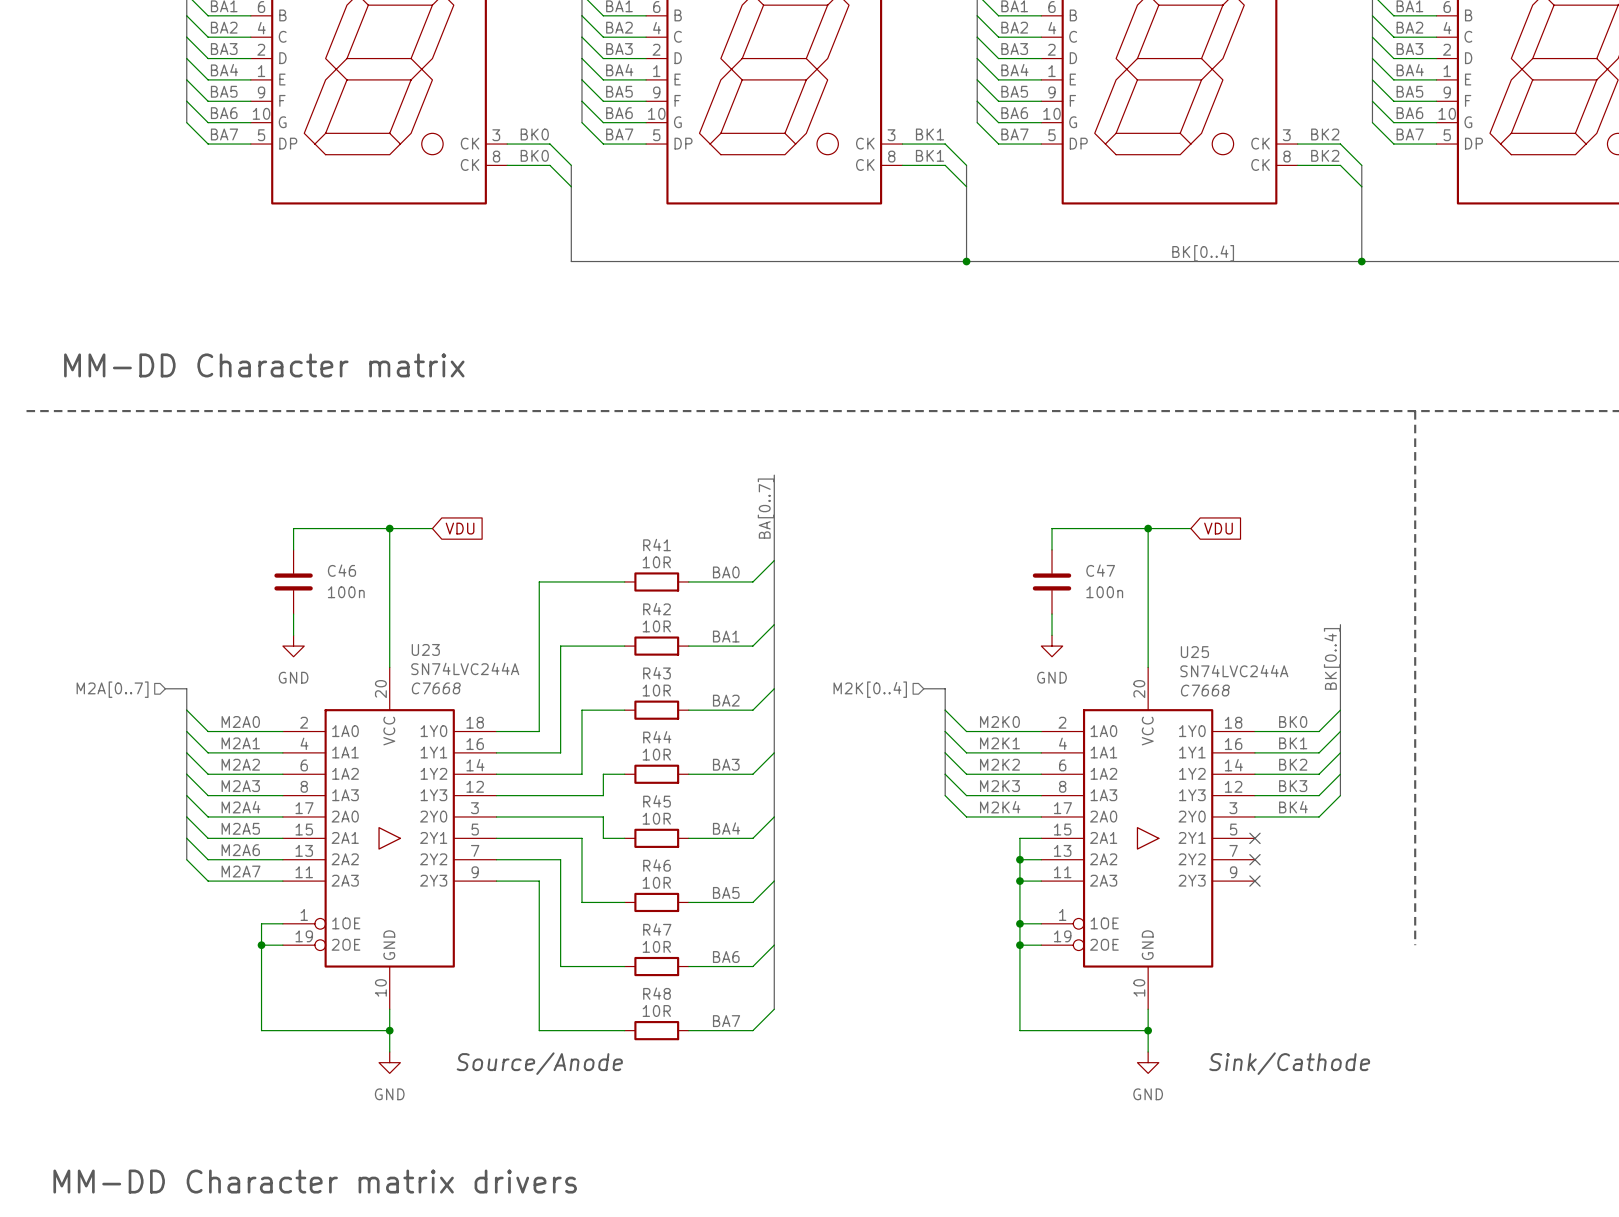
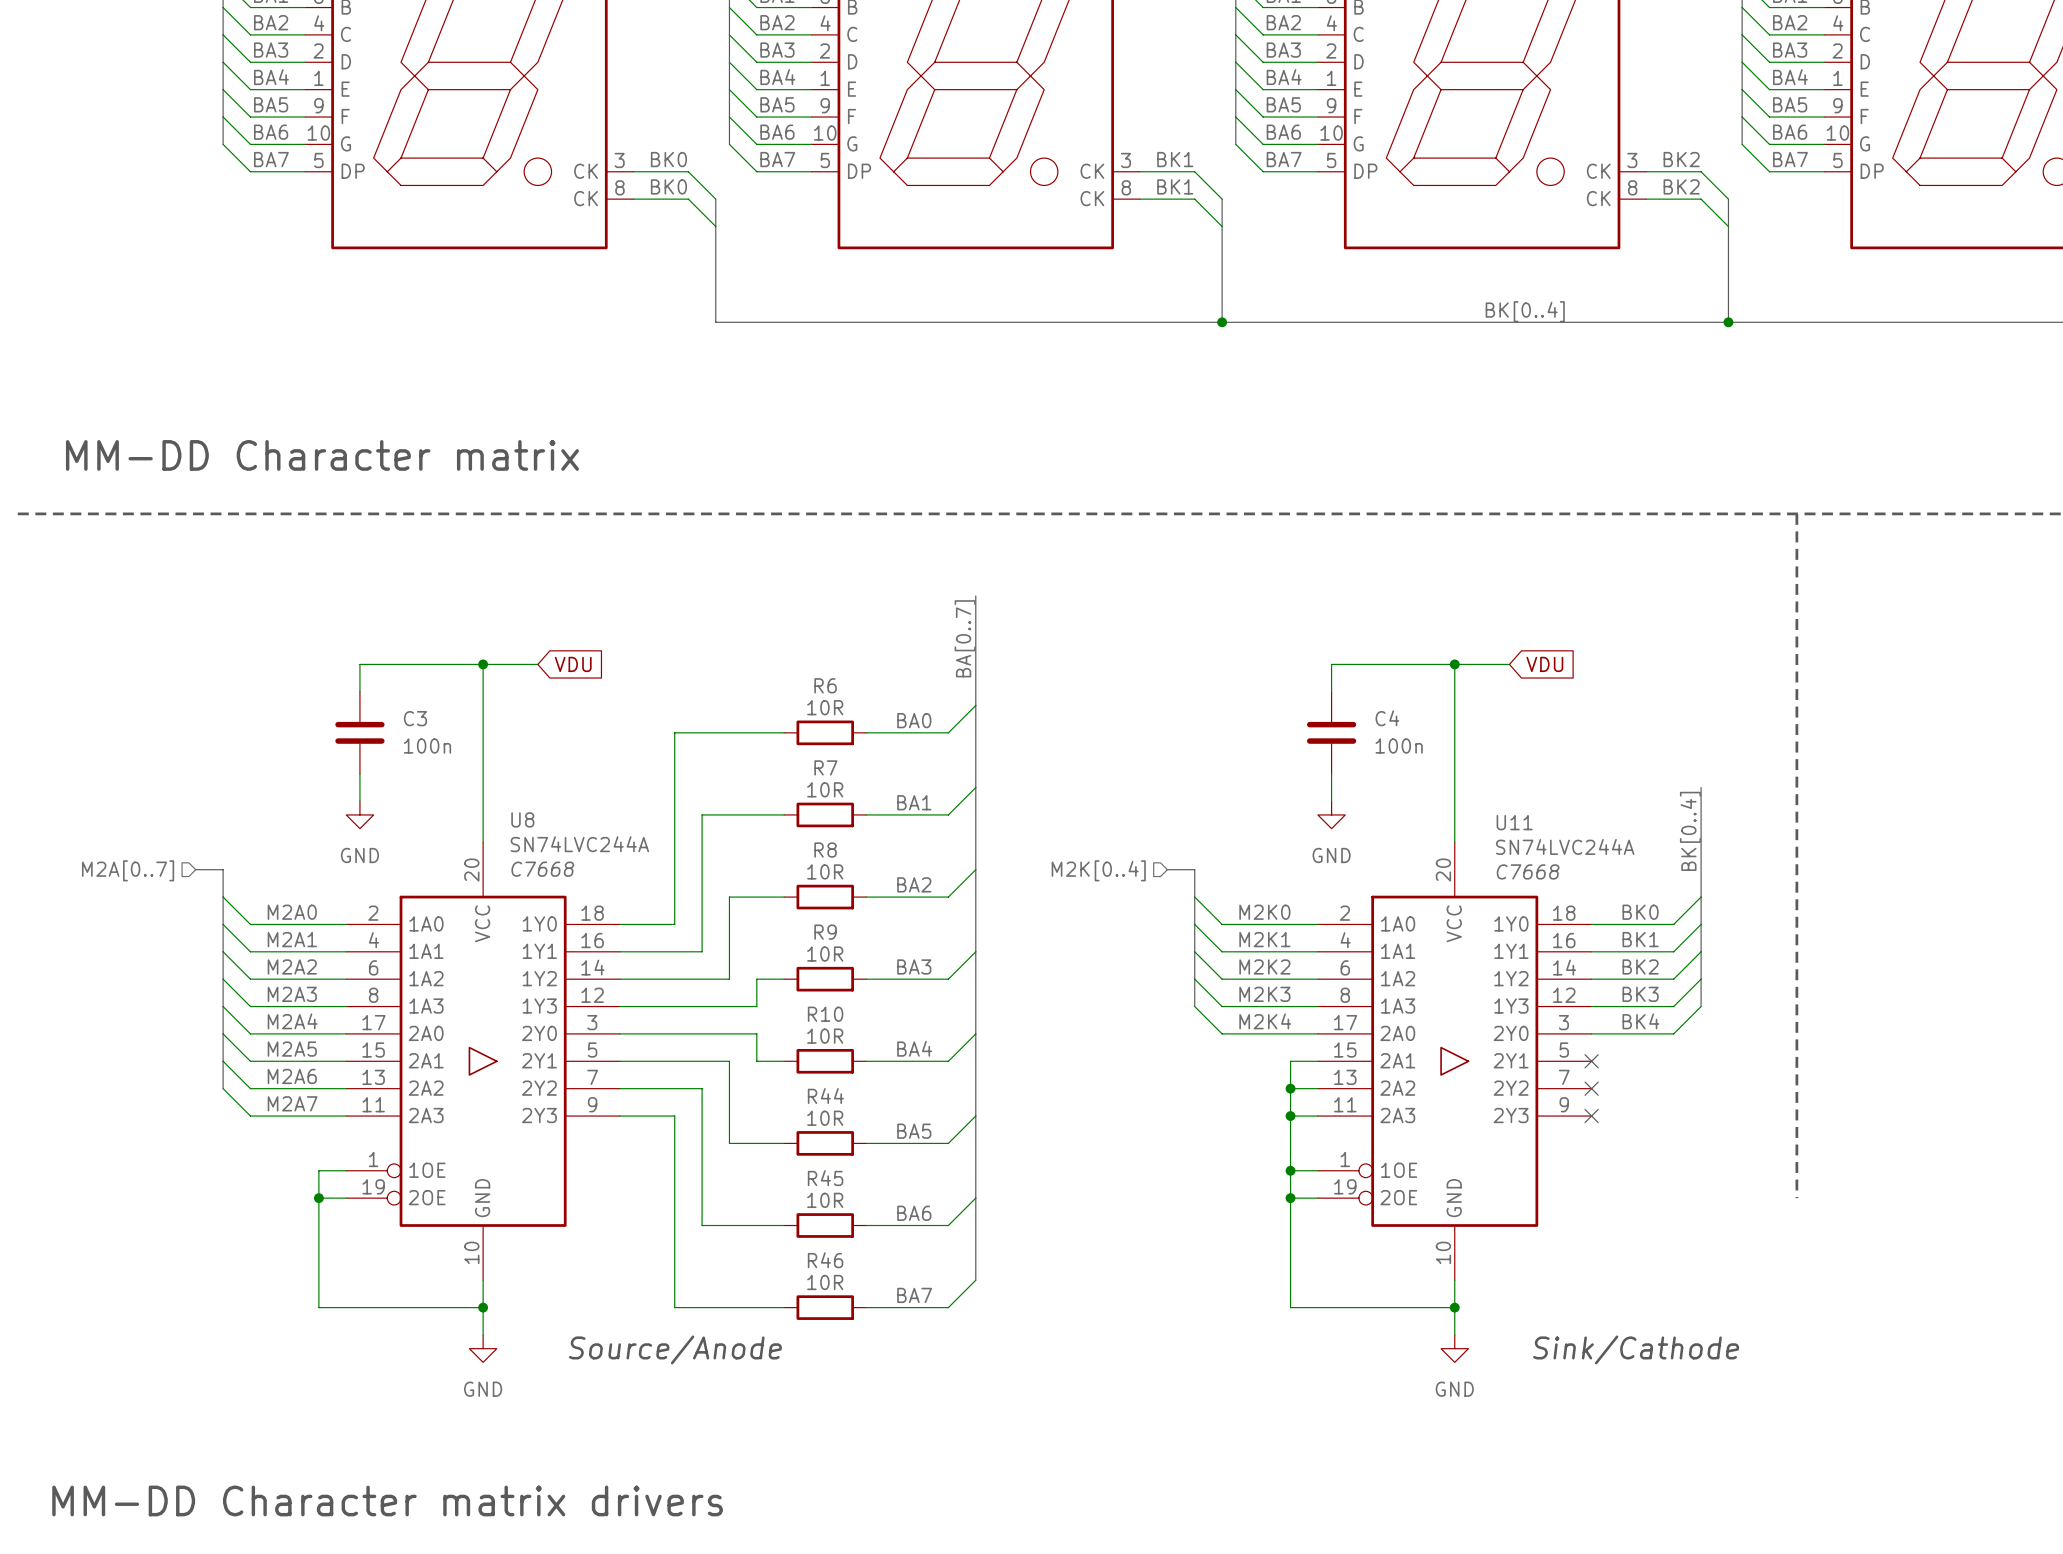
R41 name: R41 (657, 545) -> R6 (825, 685)
C46 name: C46 (341, 570) -> C3 (415, 718)
C47 name: C47 (1100, 570) -> C4 (1387, 718)
R42 name: R42 (657, 609) -> R7 (825, 767)
U23 name: U23 (425, 649) -> U8 (522, 819)
U25 name: U25 (1194, 652) -> U11 (1514, 822)
R43 name: R43 (657, 673) -> R8 (825, 850)
R44 name: R44 (657, 737) -> R9 (825, 932)
R45 name: R45 (657, 801) -> R10 (825, 1014)
R46 name: R46 (657, 865) -> R44 (825, 1096)
R47 name: R47 (657, 929) -> R45 (825, 1178)
R48 name: R48 (657, 993) -> R46 (825, 1260)

